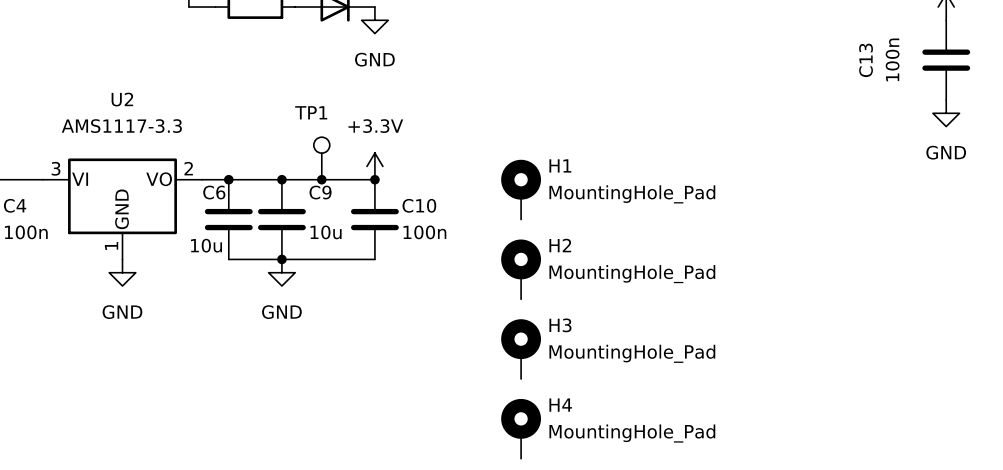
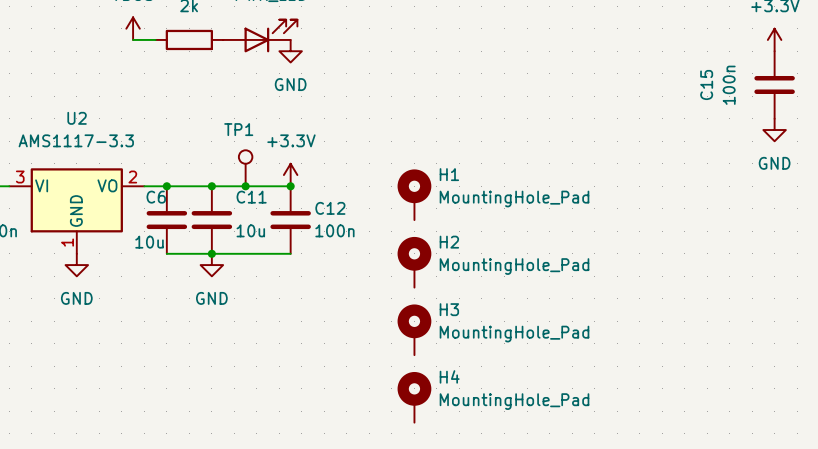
C13 name: C13 (866, 60) -> C15 (706, 84)
C9 name: C9 (320, 192) -> C11 (251, 197)
C10 name: C10 (419, 205) -> C12 (330, 208)

